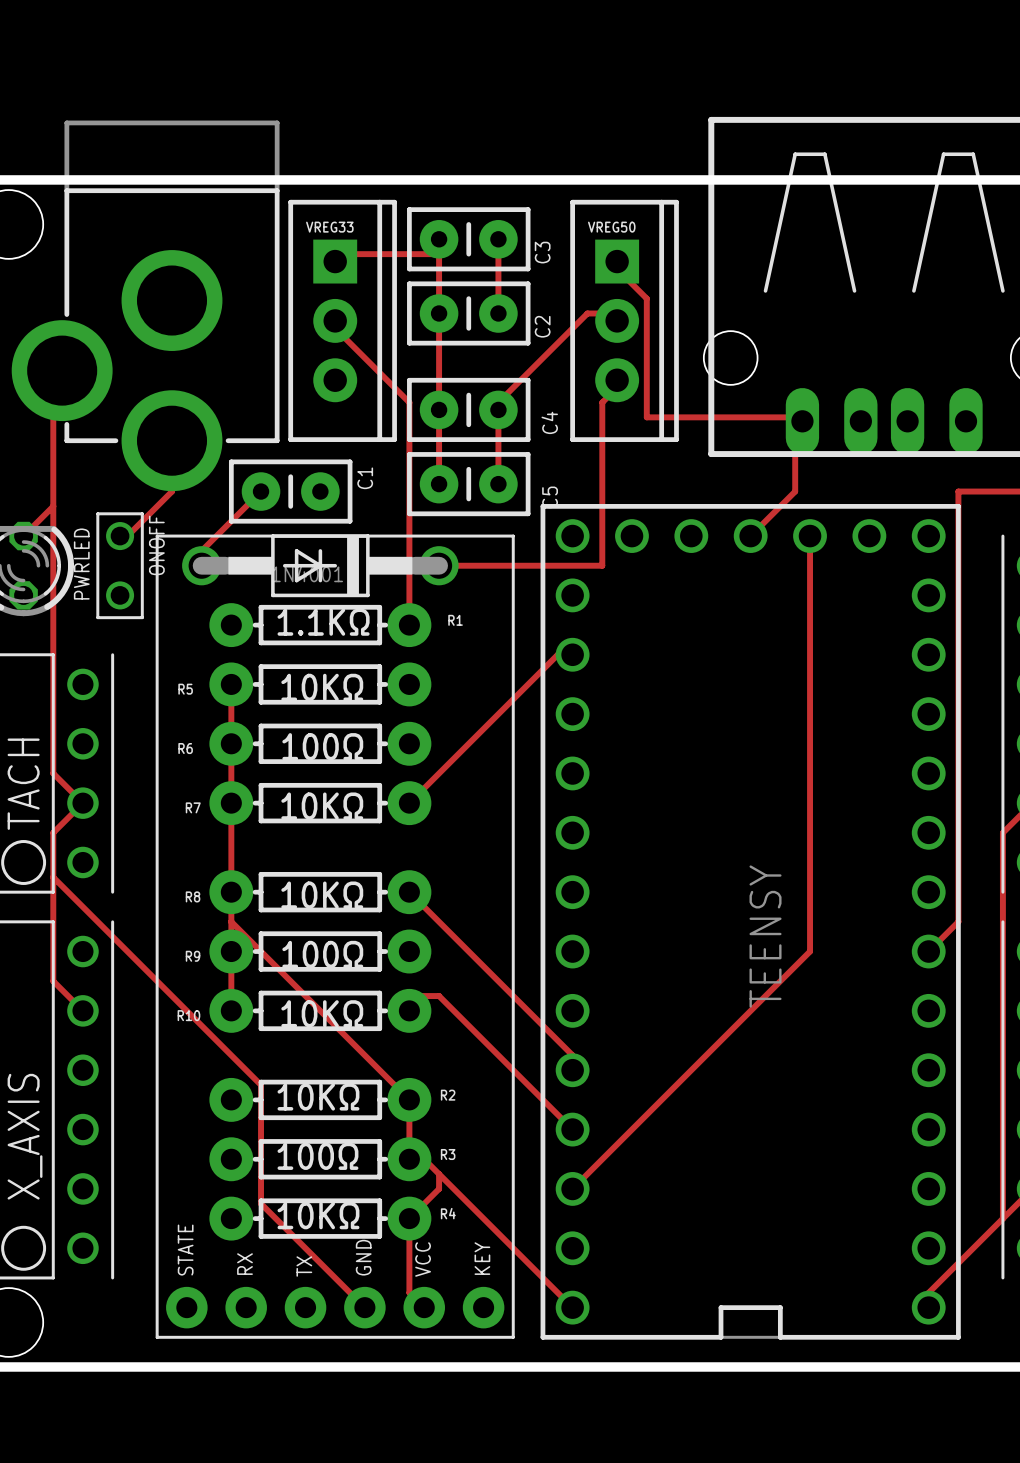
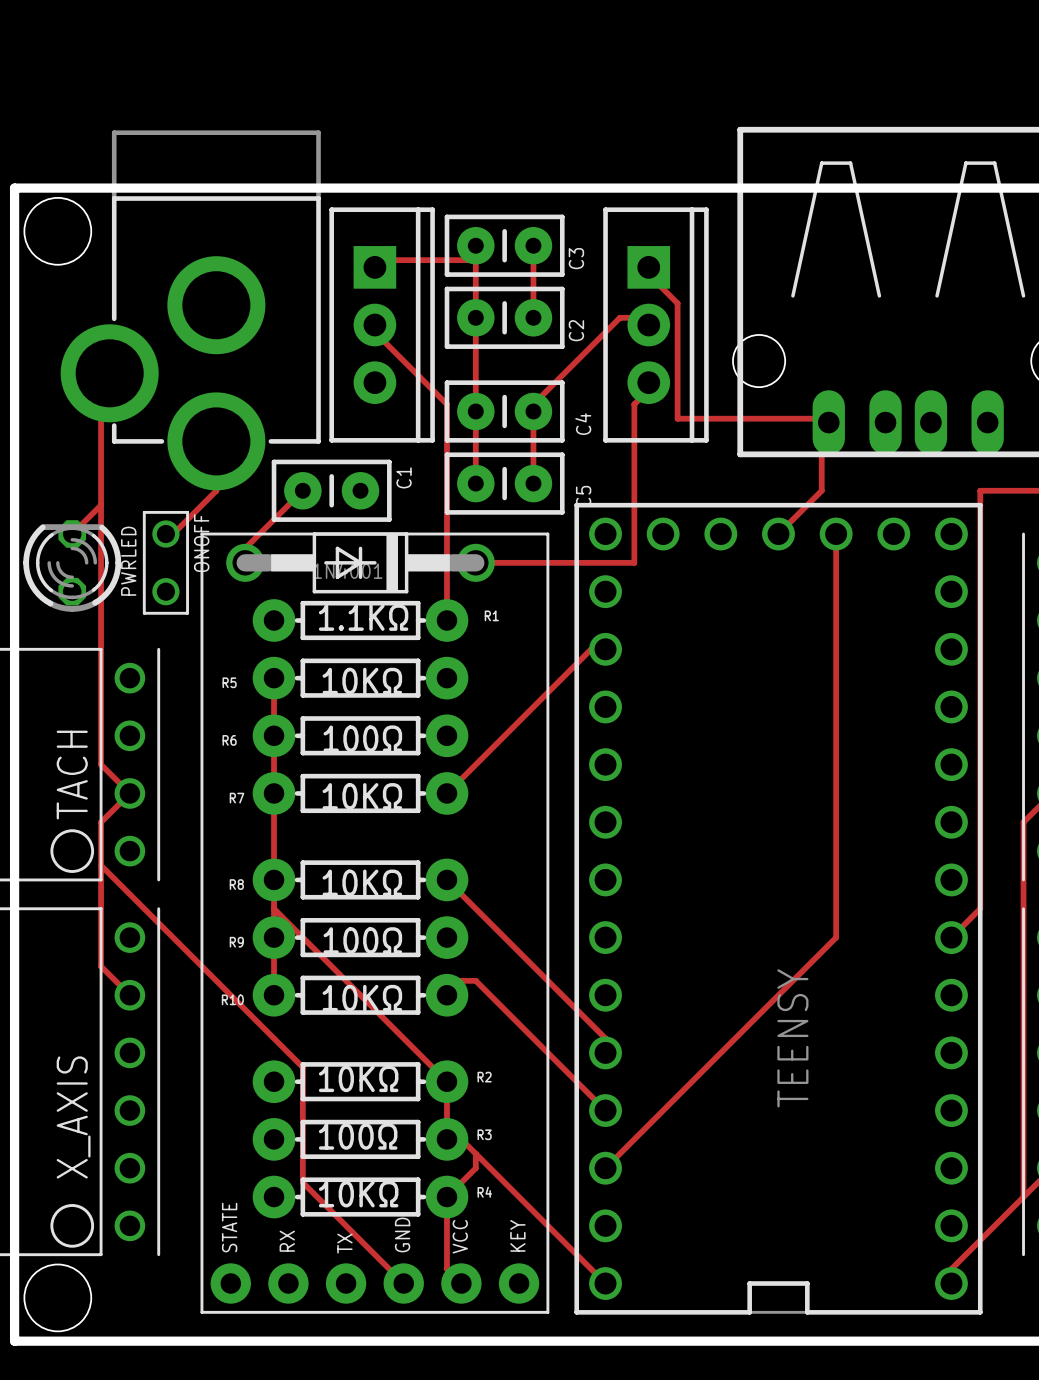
VREG33 name: VREG33 (329, 227) -> none
VREG50 name: VREG50 (611, 227) -> none
part value position: TEENSY (765, 936) -> TEENSY (792, 1038)

